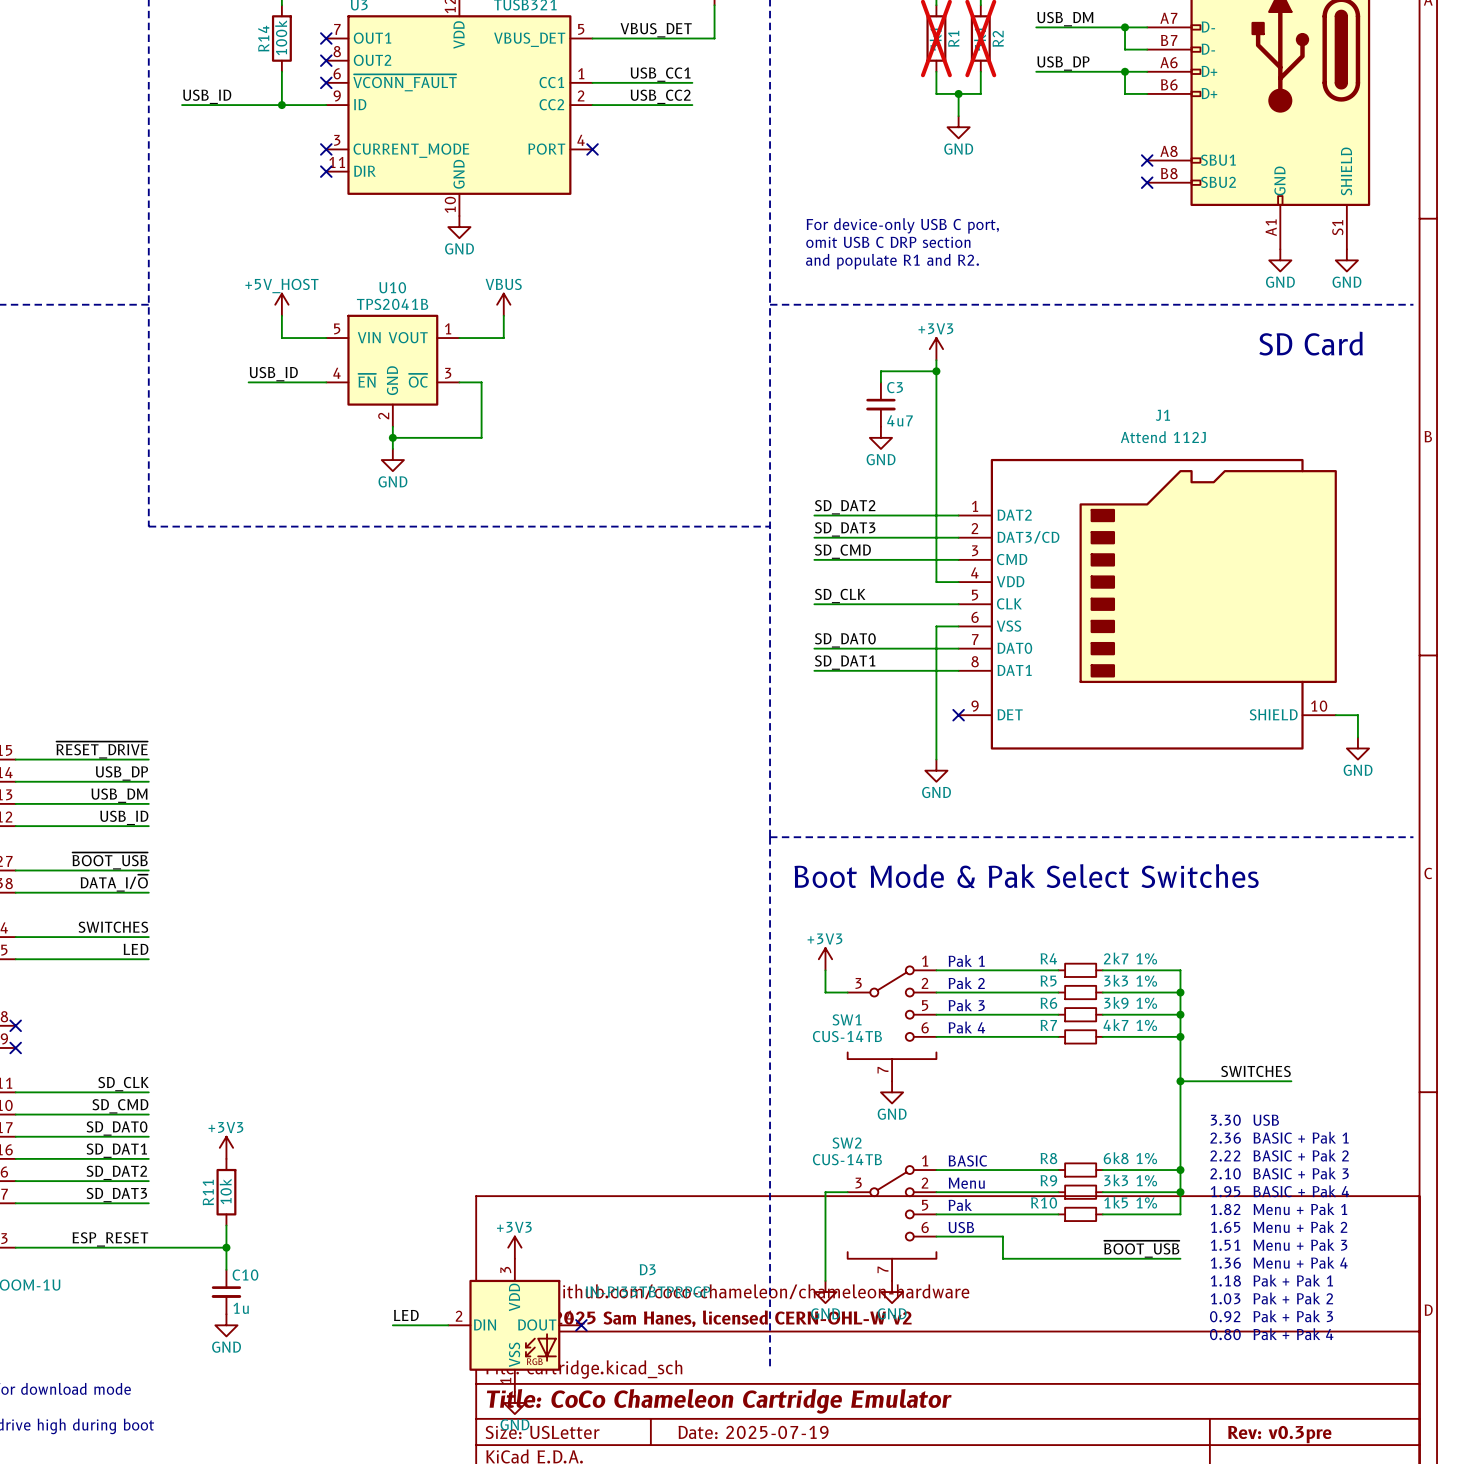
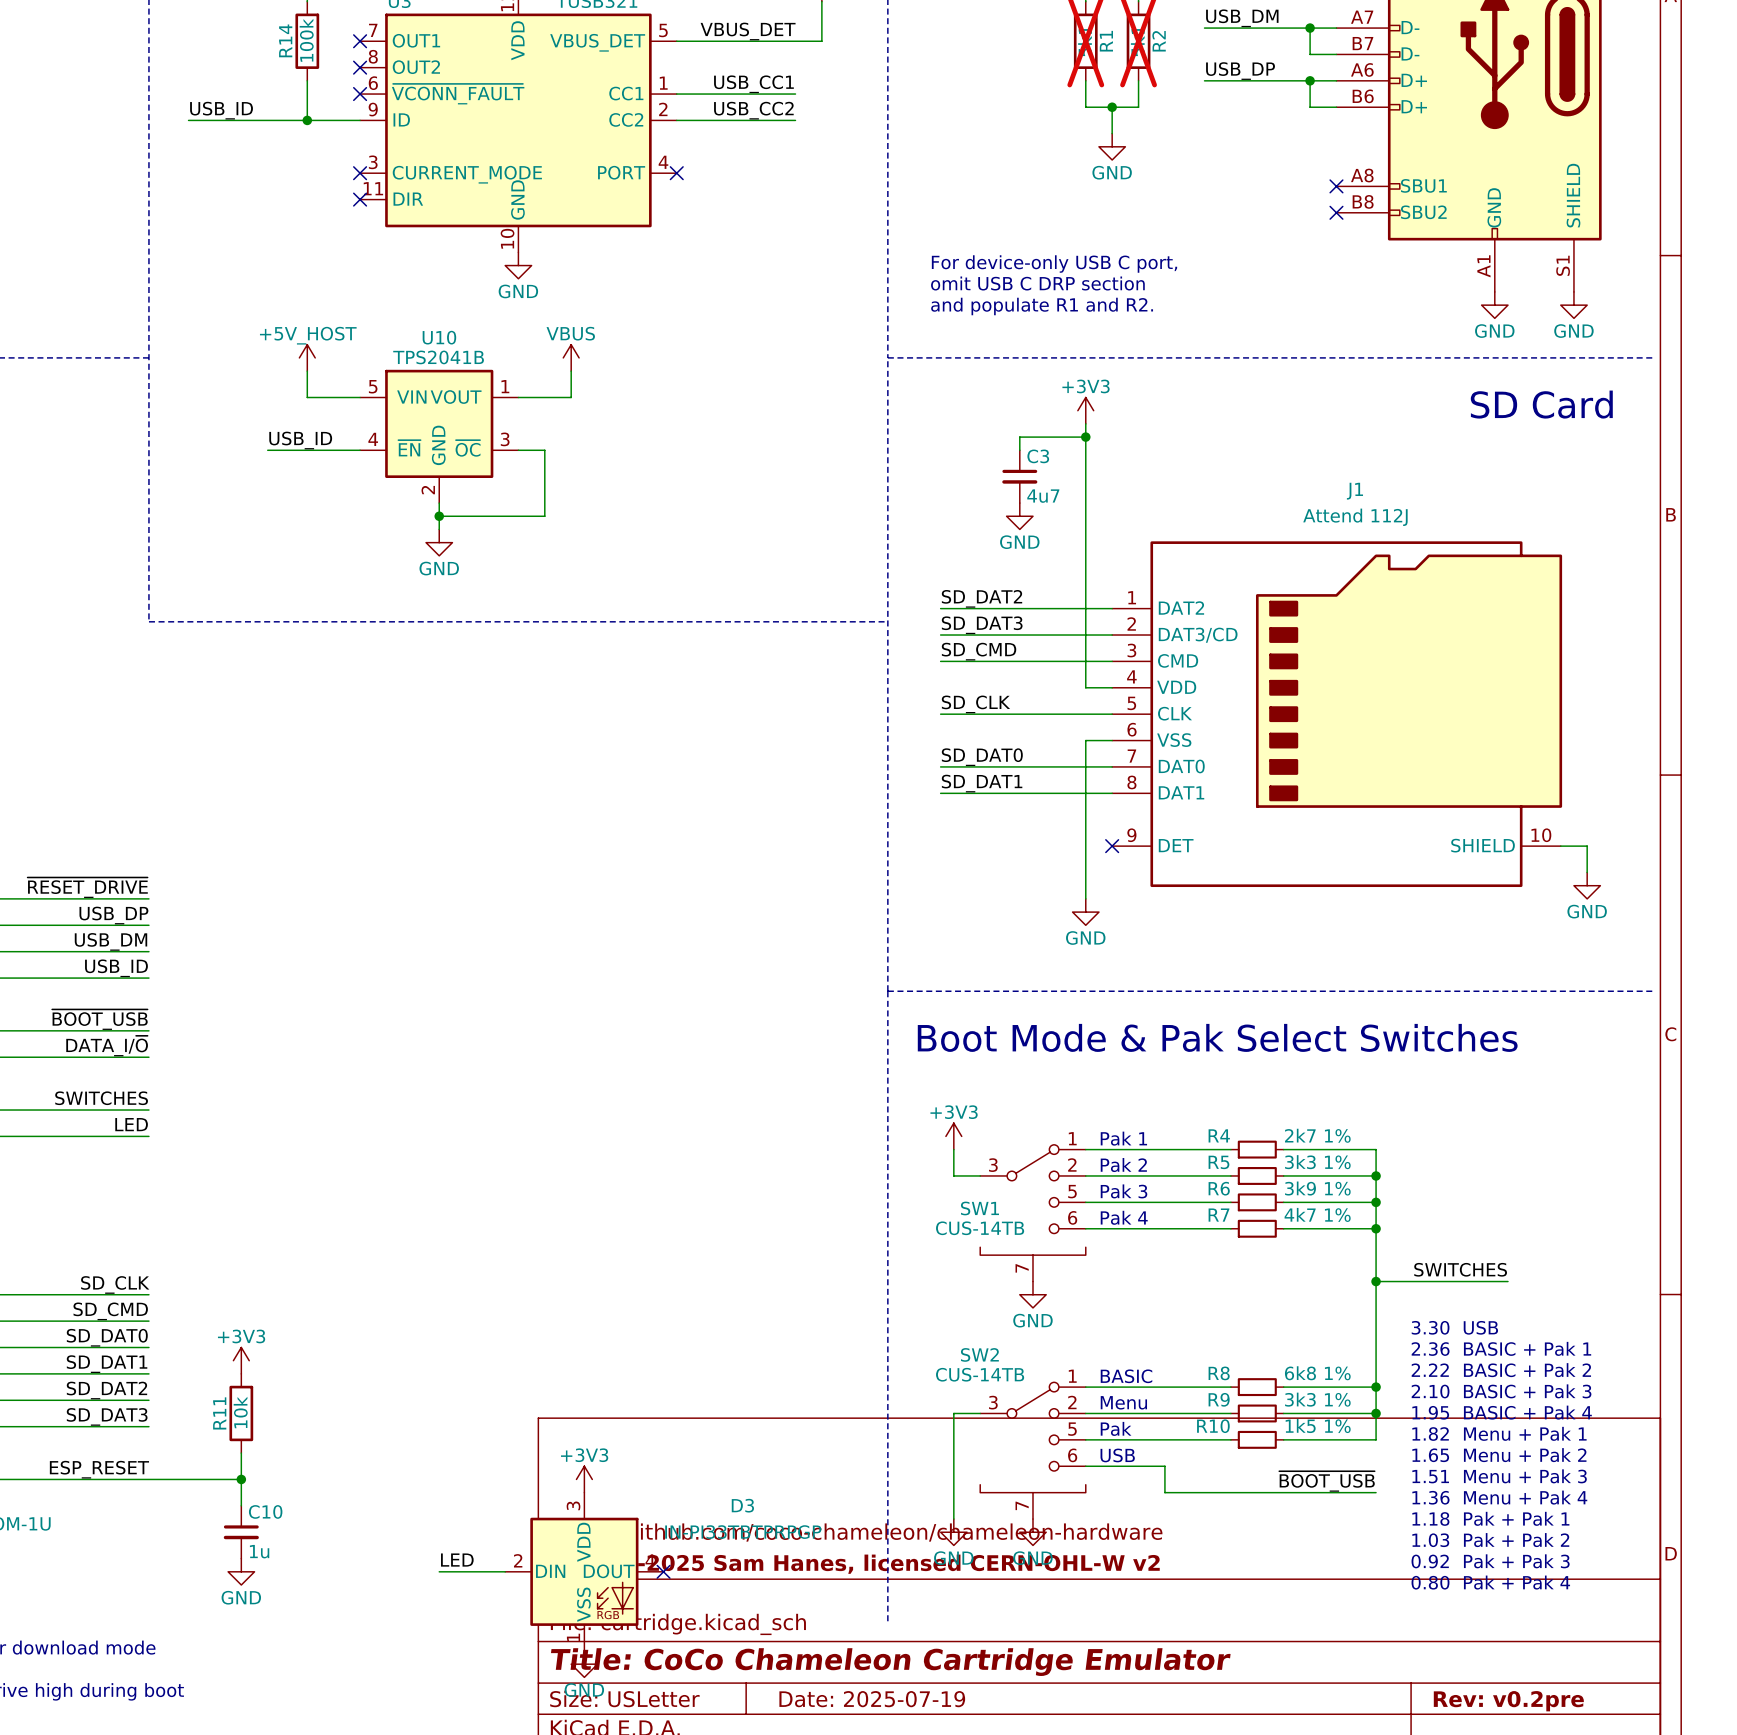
title block: Rev: v0.3pre (1279, 1434) -> Rev: v0.2pre (1508, 1701)

